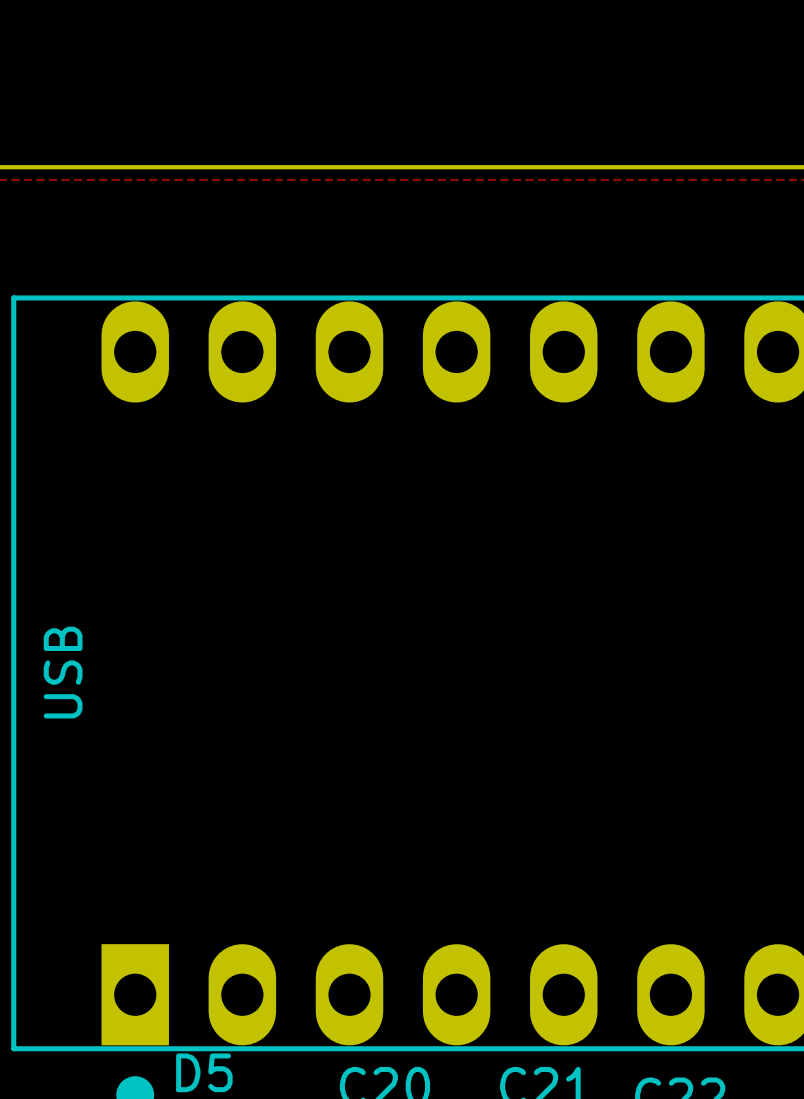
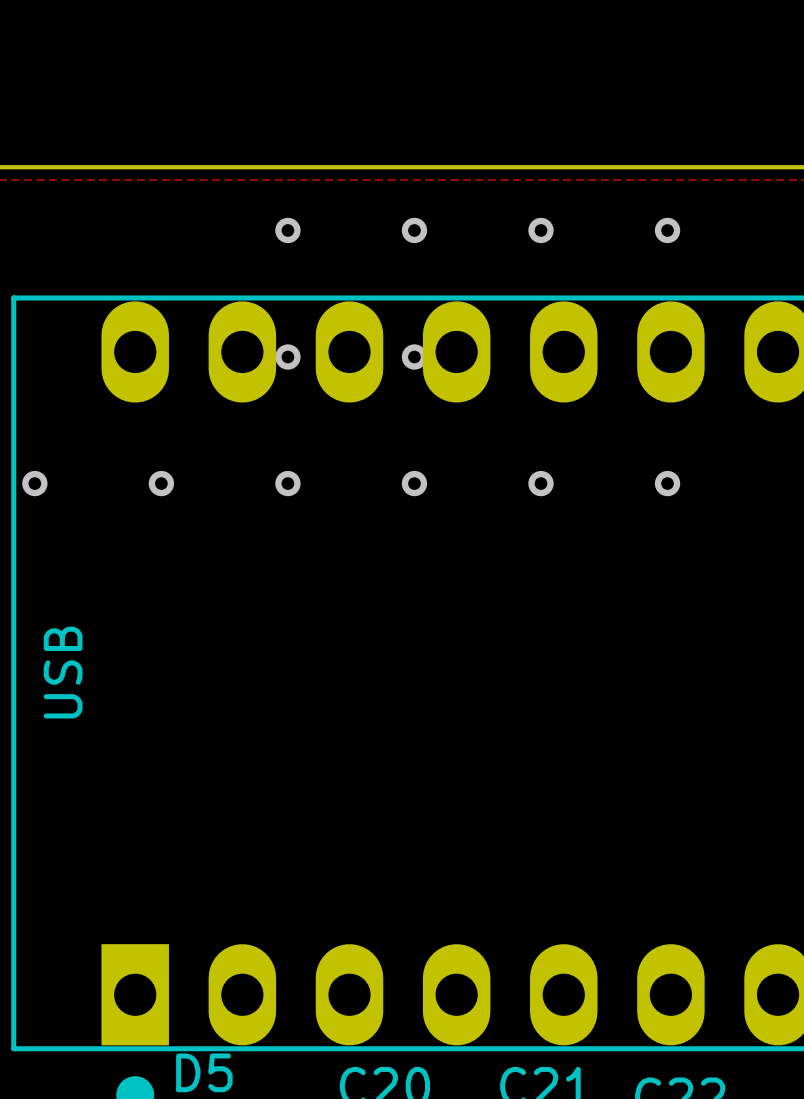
via: none -> (287, 230)
via: none -> (414, 230)
via: none -> (541, 230)
via: none -> (667, 230)
via: none -> (287, 357)
via: none -> (414, 357)
via: none -> (34, 483)
via: none -> (161, 483)
via: none -> (287, 483)
via: none -> (414, 483)
via: none -> (541, 483)
via: none -> (667, 483)

